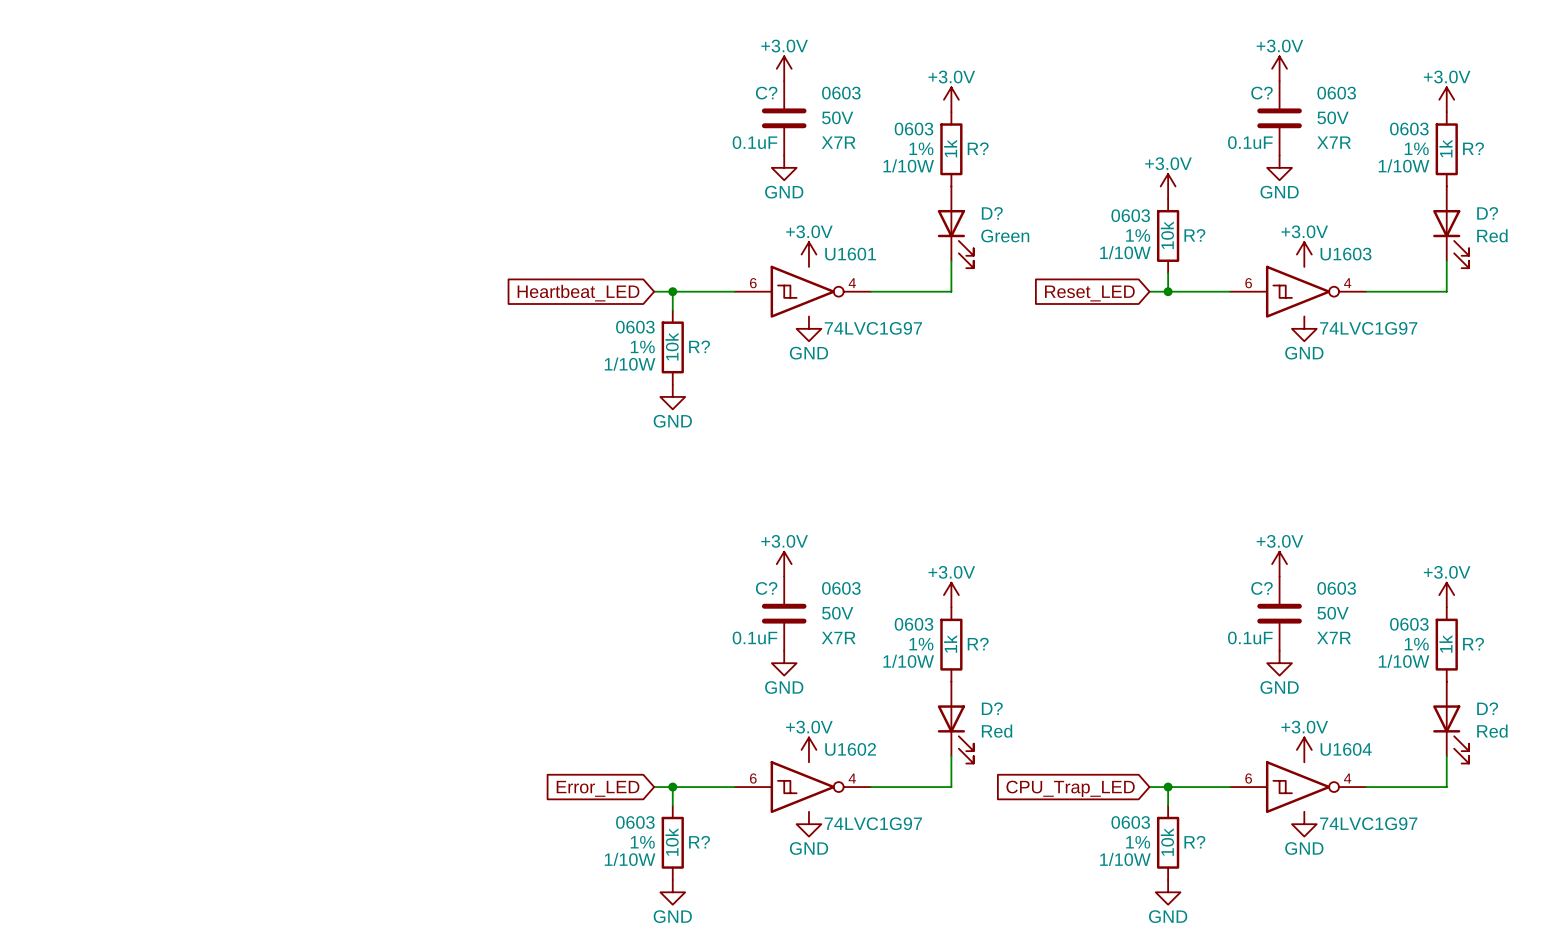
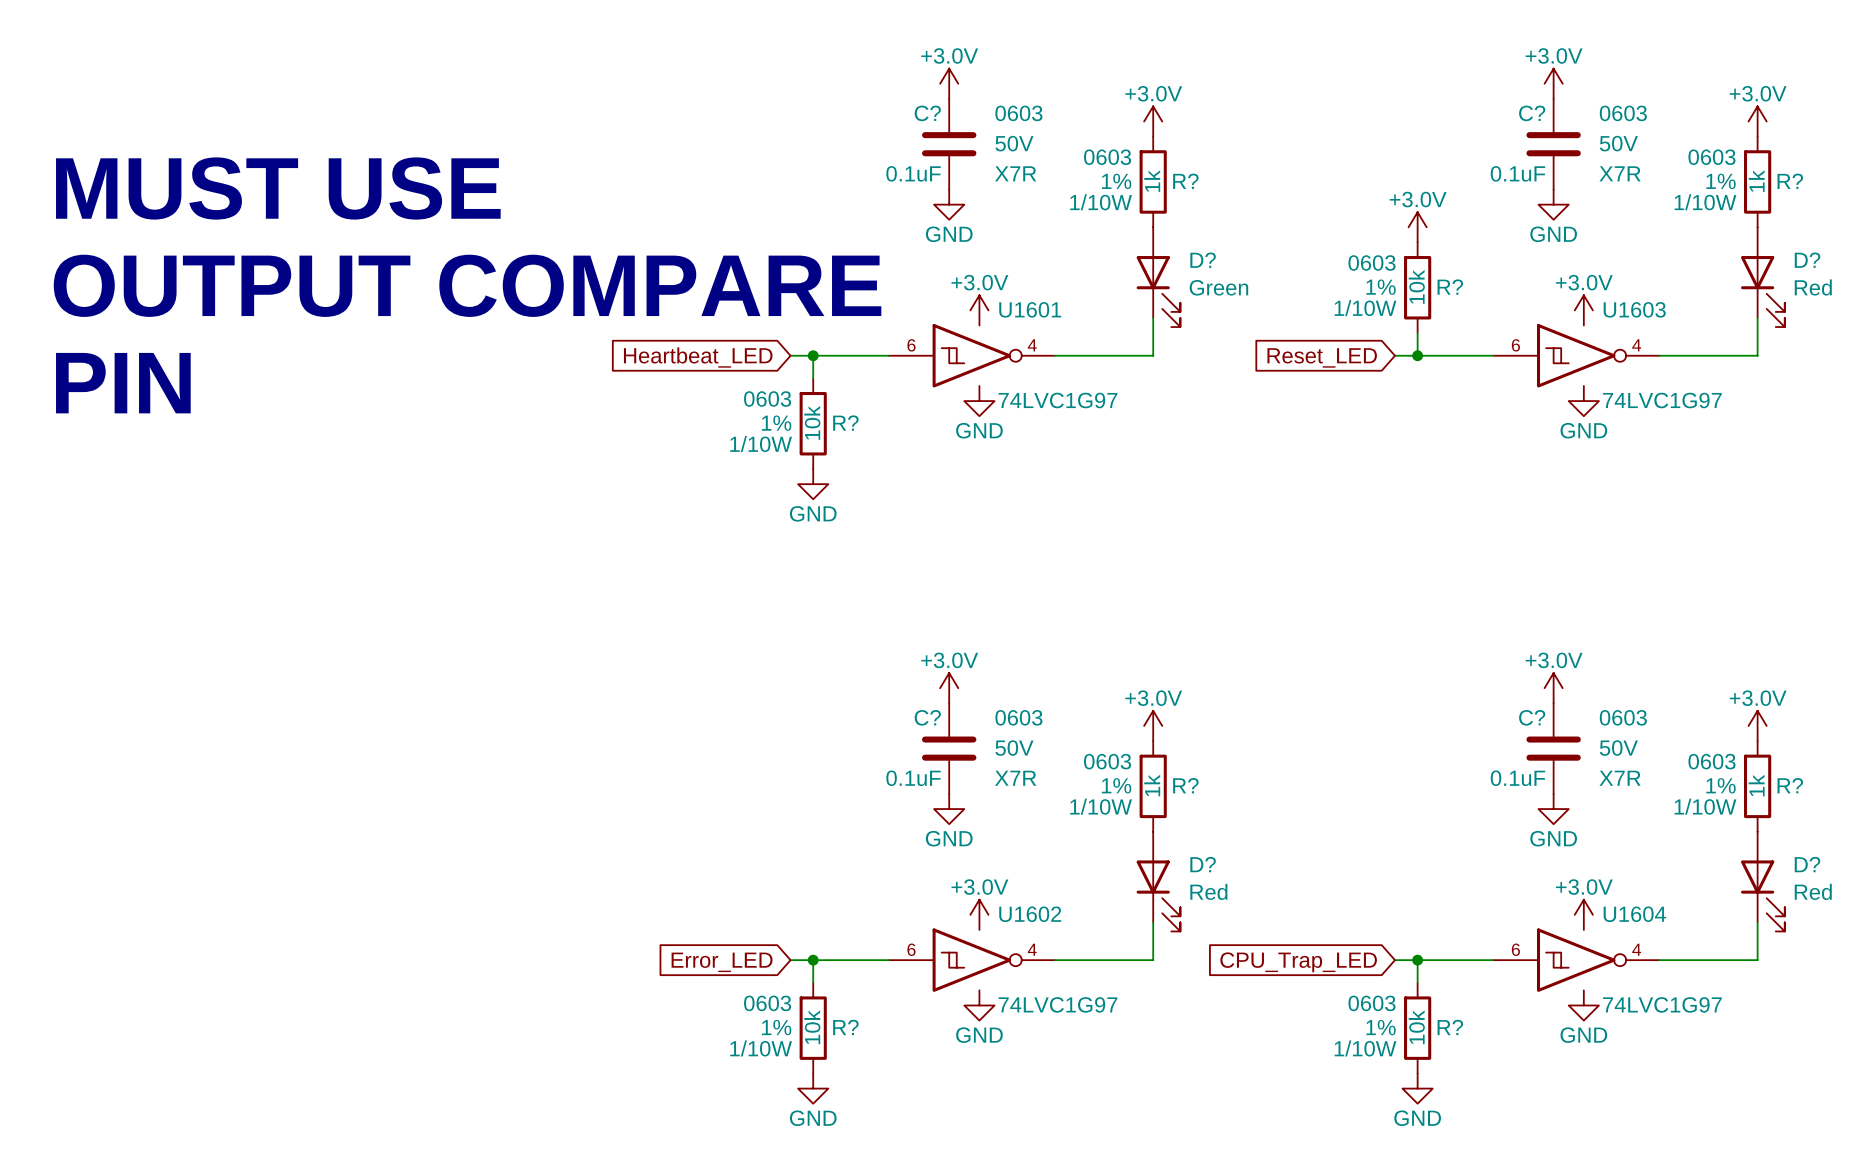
text: none -> MUST USE (278, 188)
text: none -> OUTPUT COMPARE (467, 285)
text: none -> PIN (123, 383)

